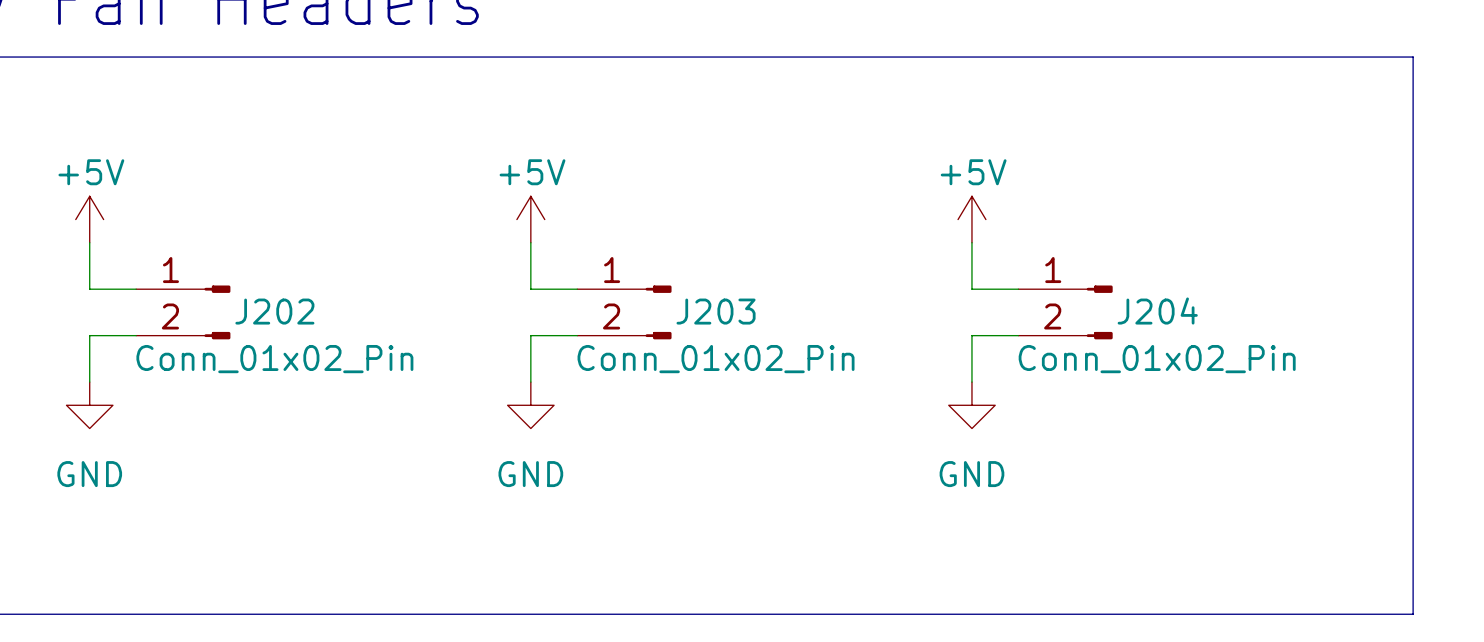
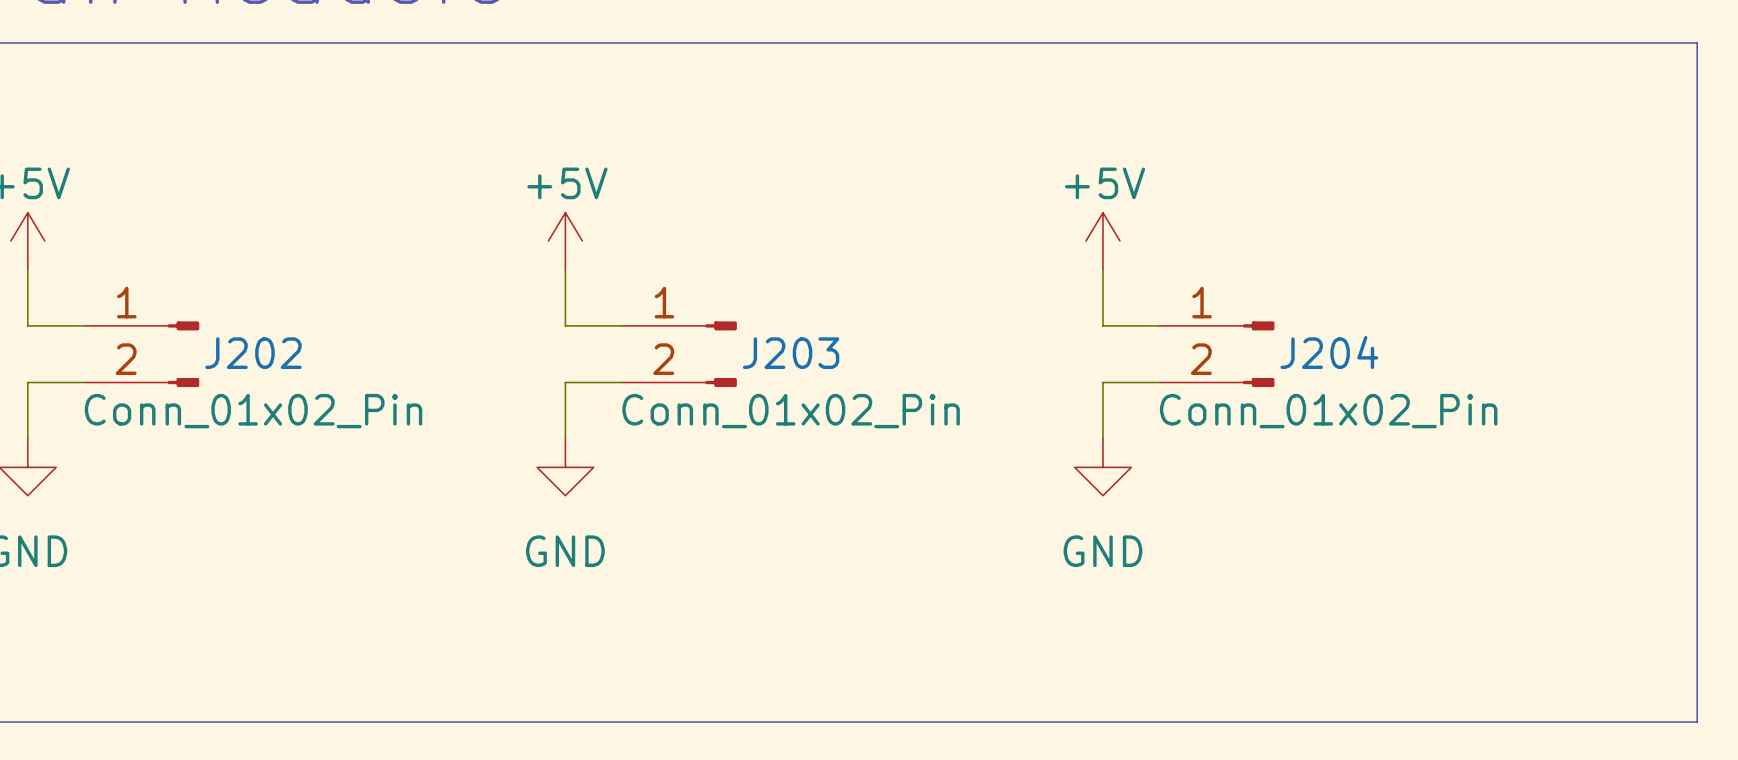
line: (1413, 57) (1413, 614) -> (1640, 42) (1697, 42) (1697, 722) (1640, 722)

